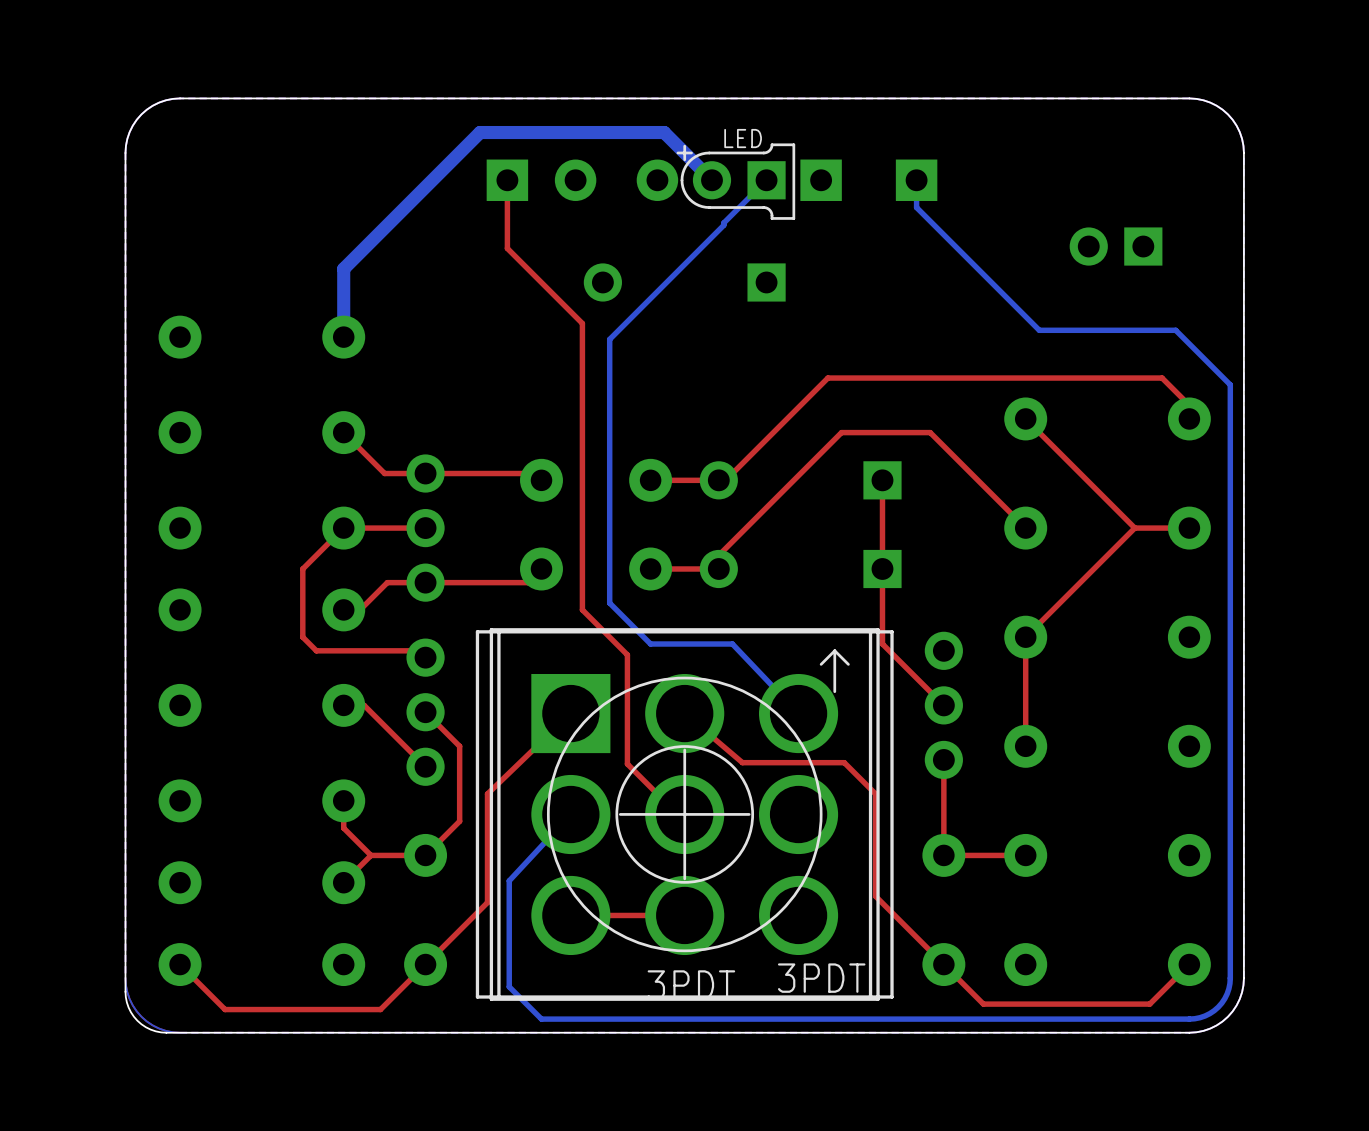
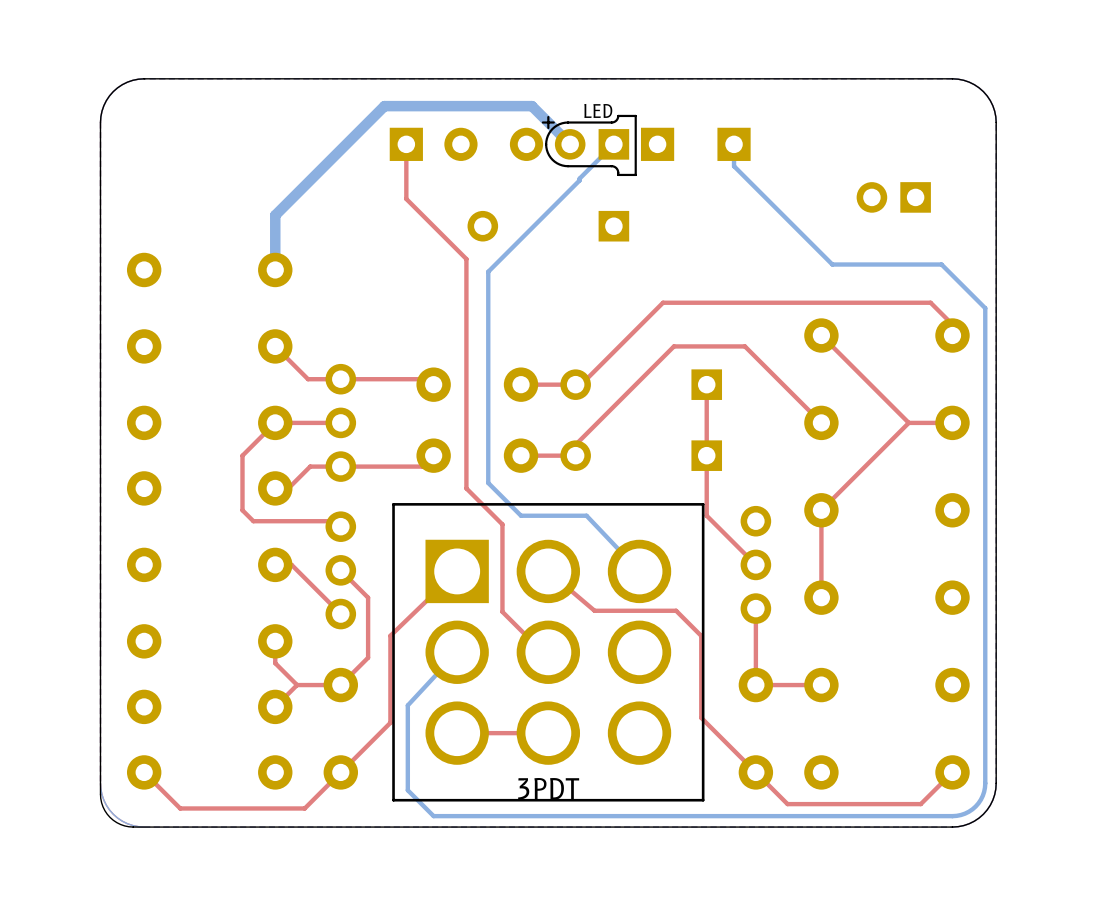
drawing: [475, 630, 894, 999] -> none

